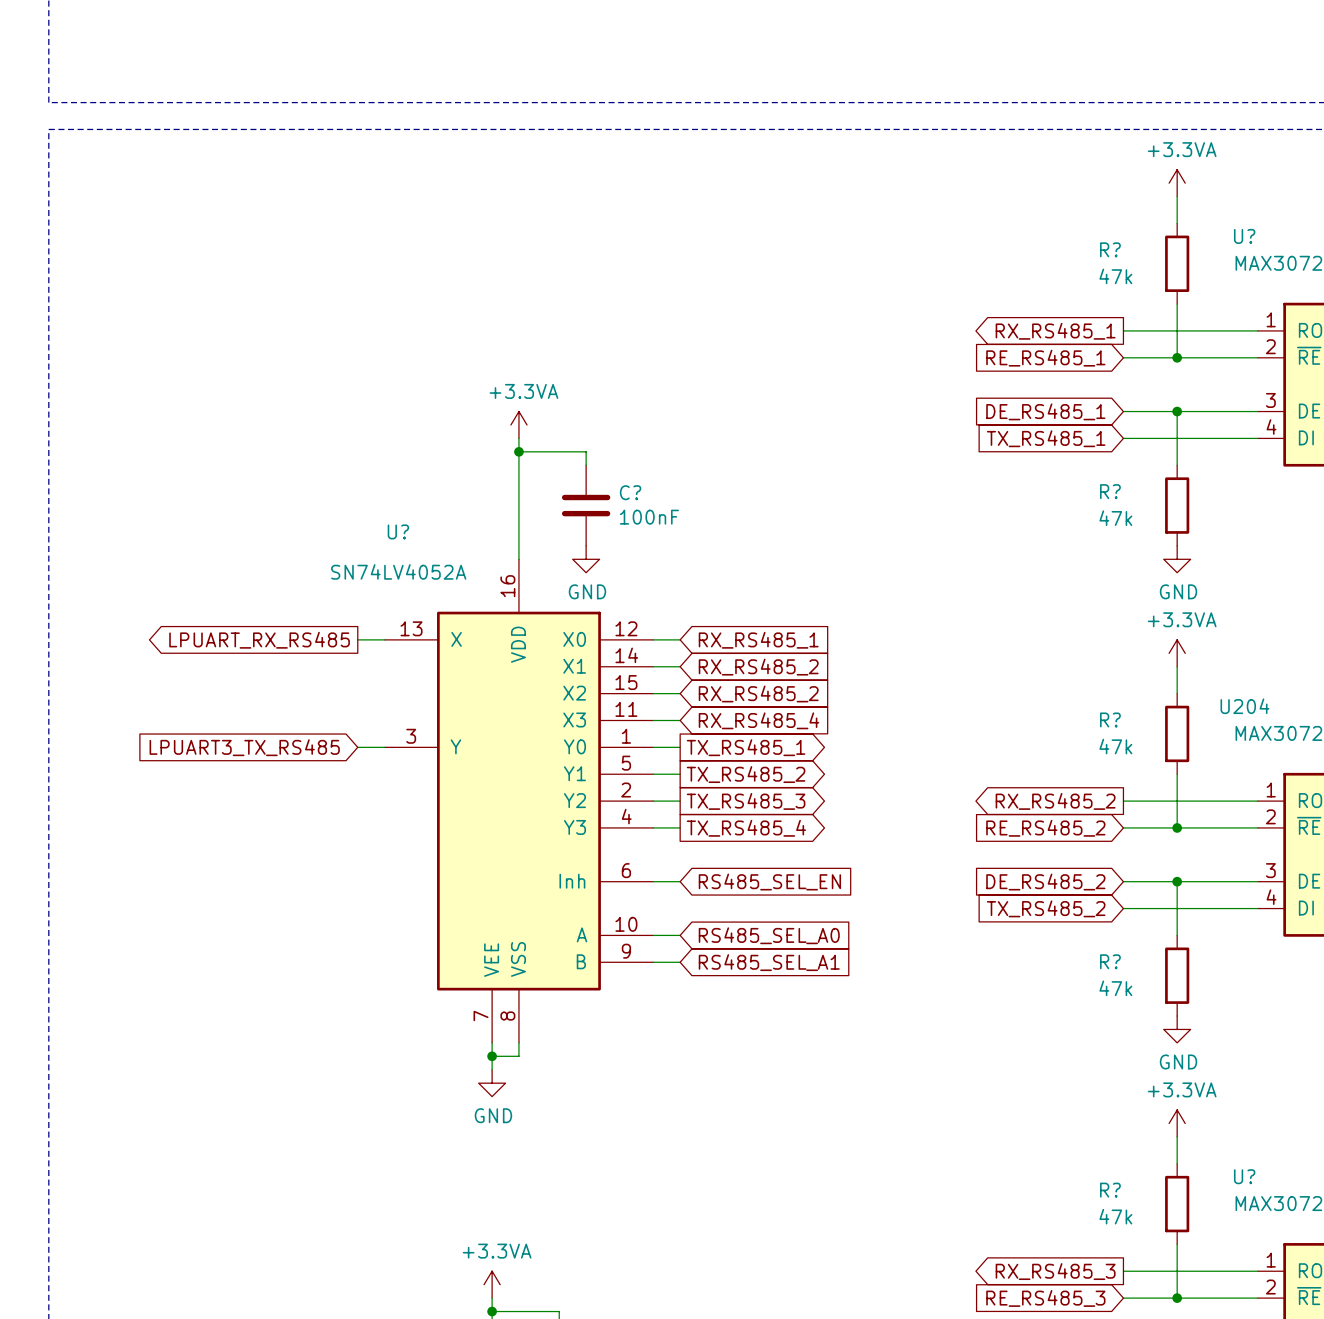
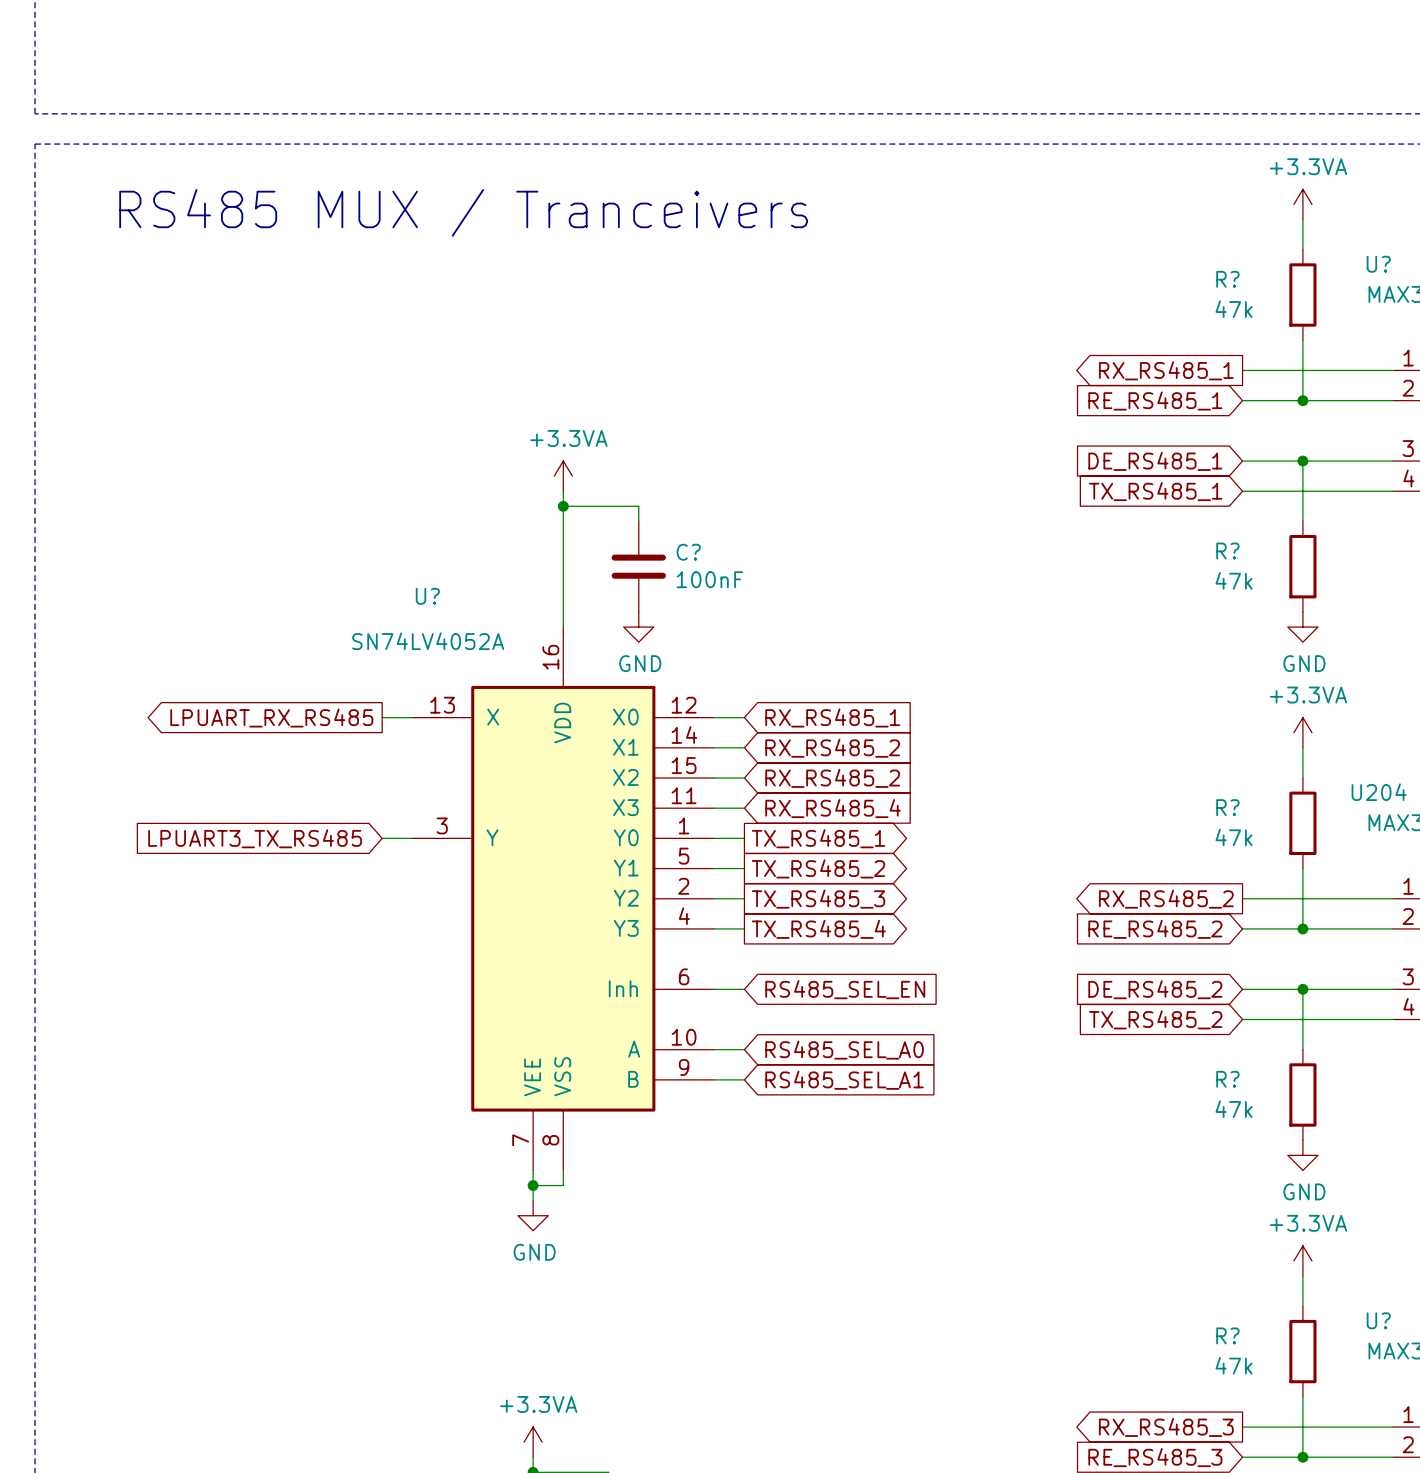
text: none -> RS485 MUX / Tranceivers (463, 212)

